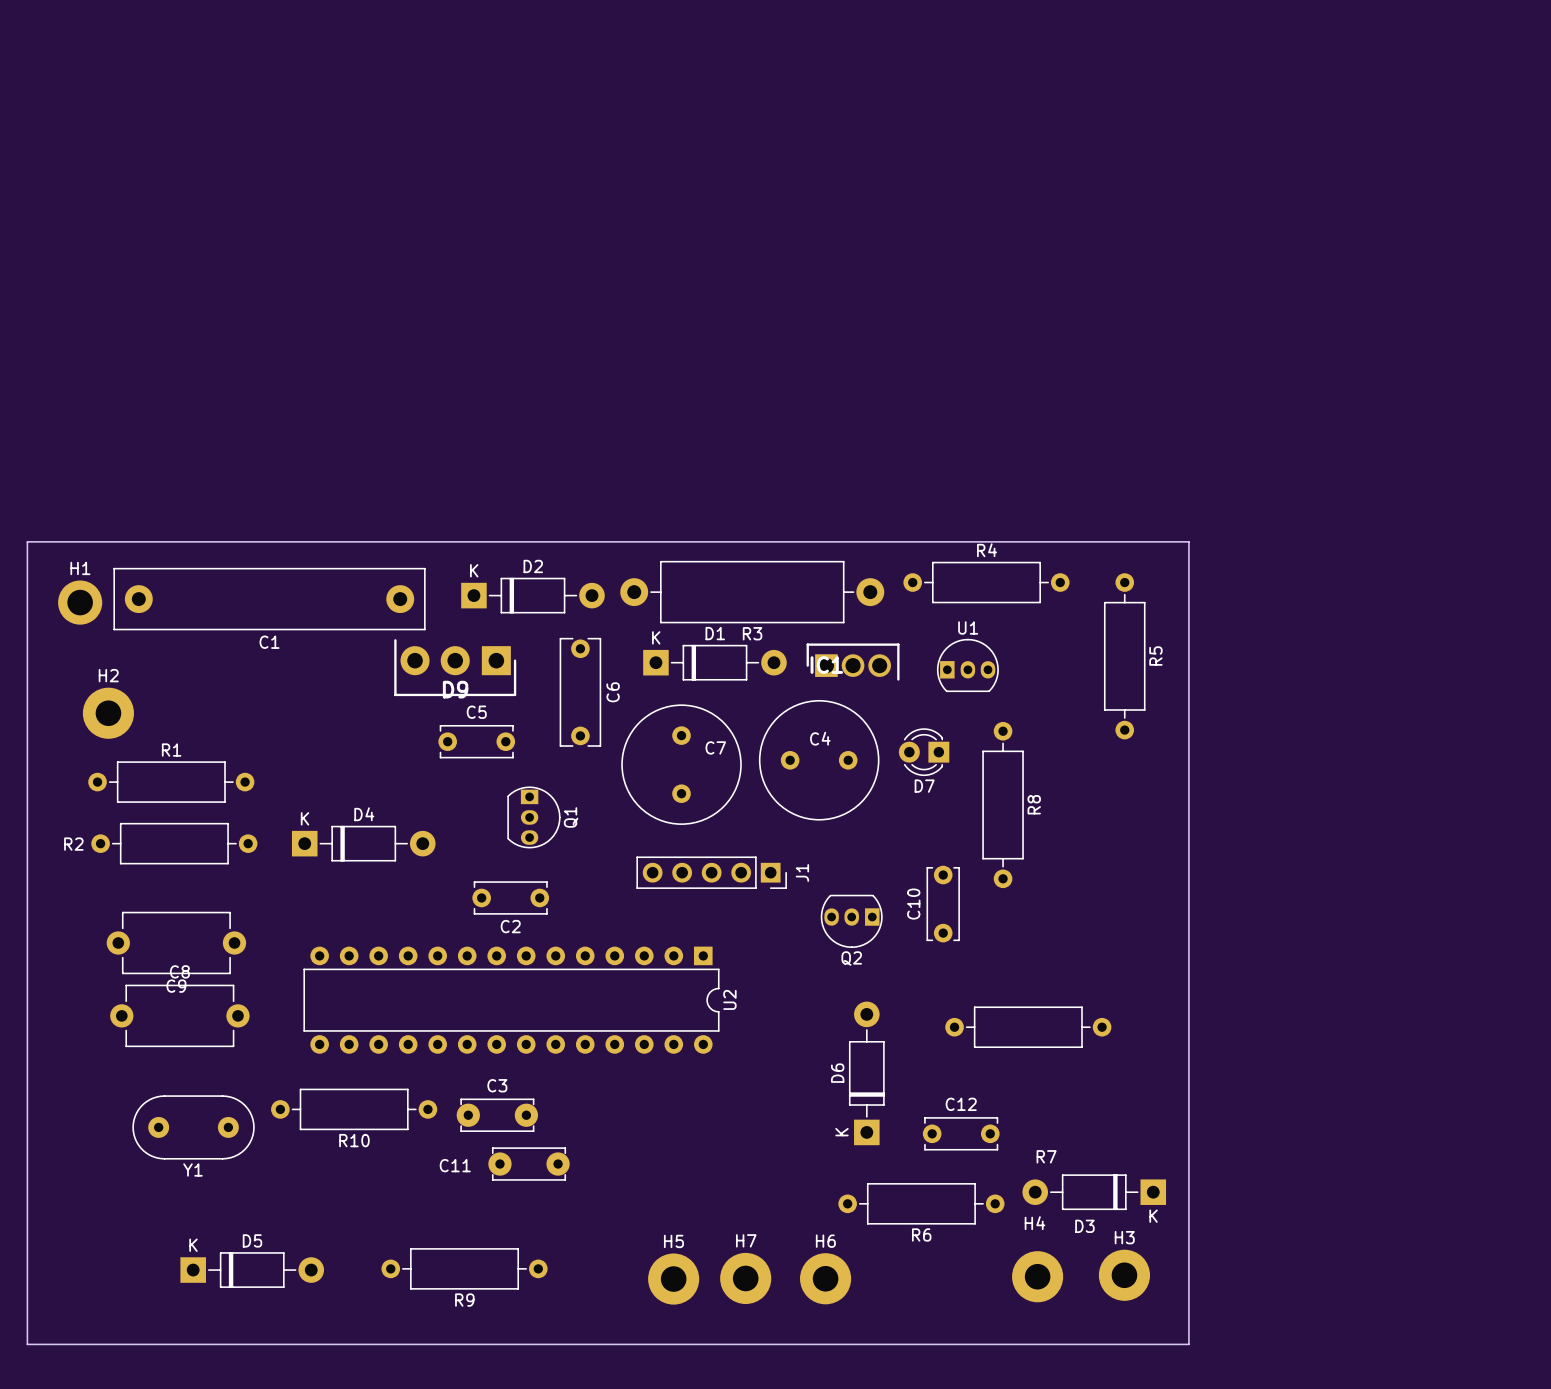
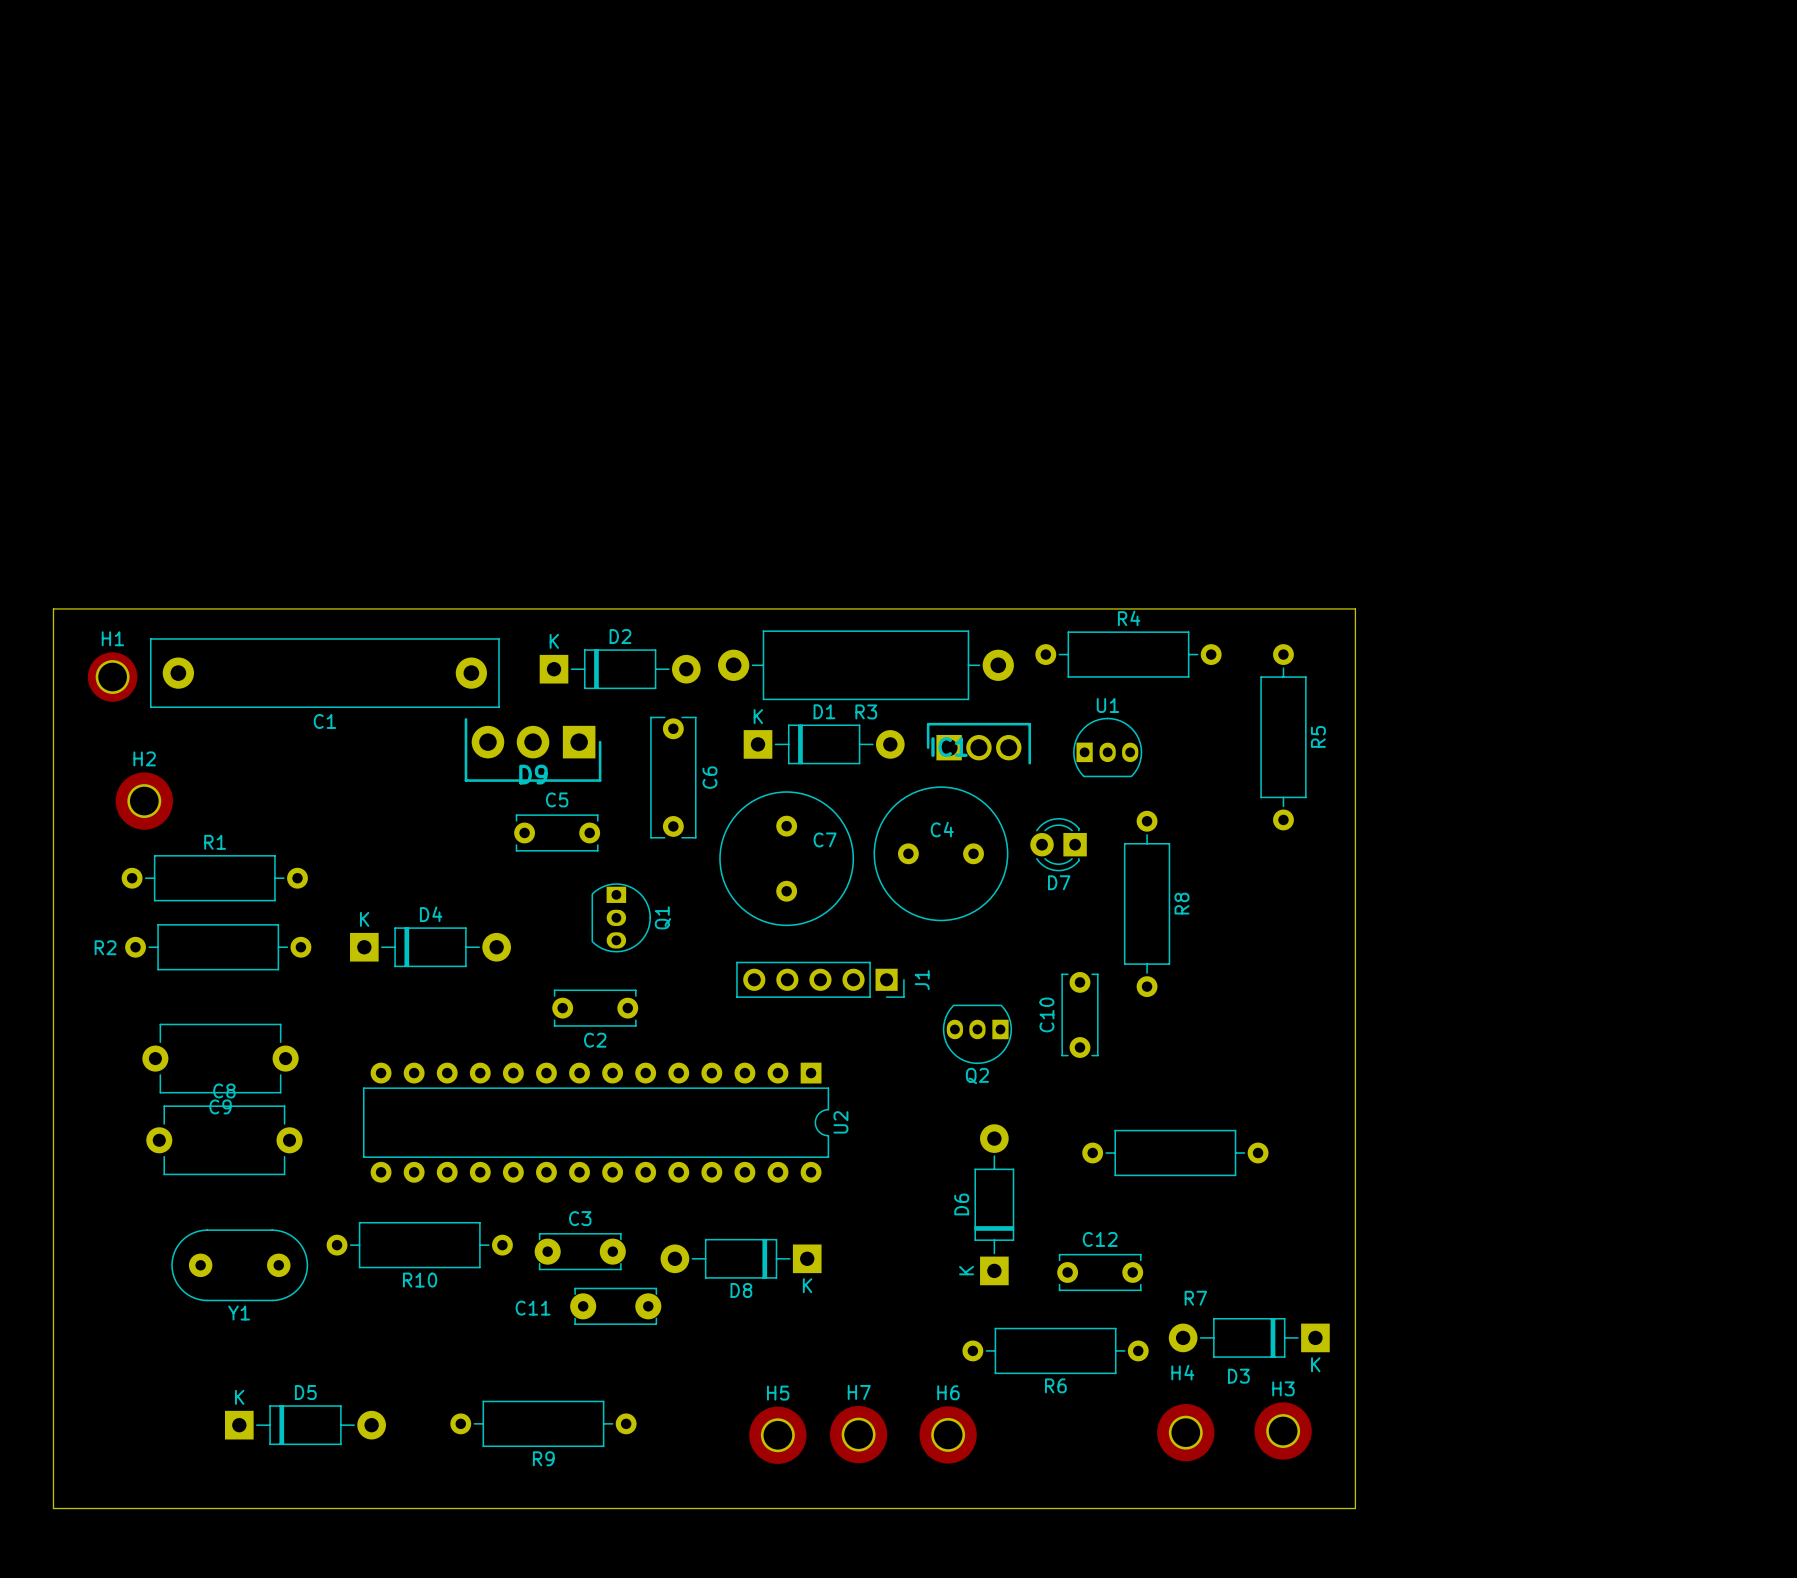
D8: none -> (741, 1258)

